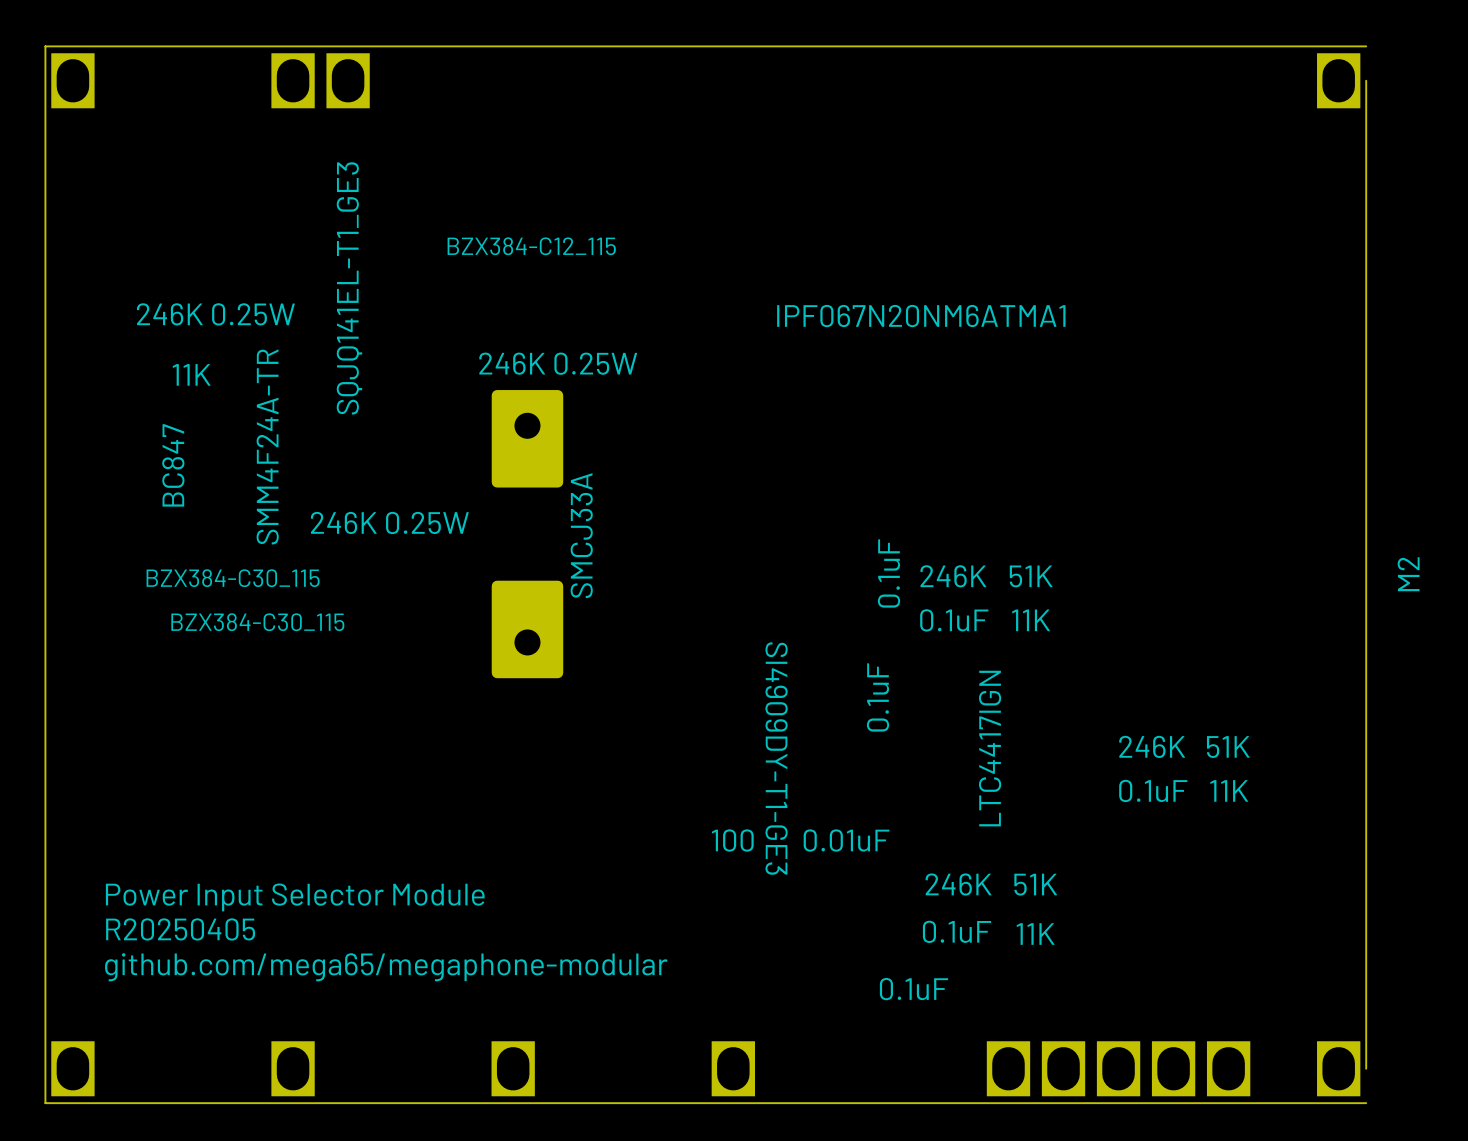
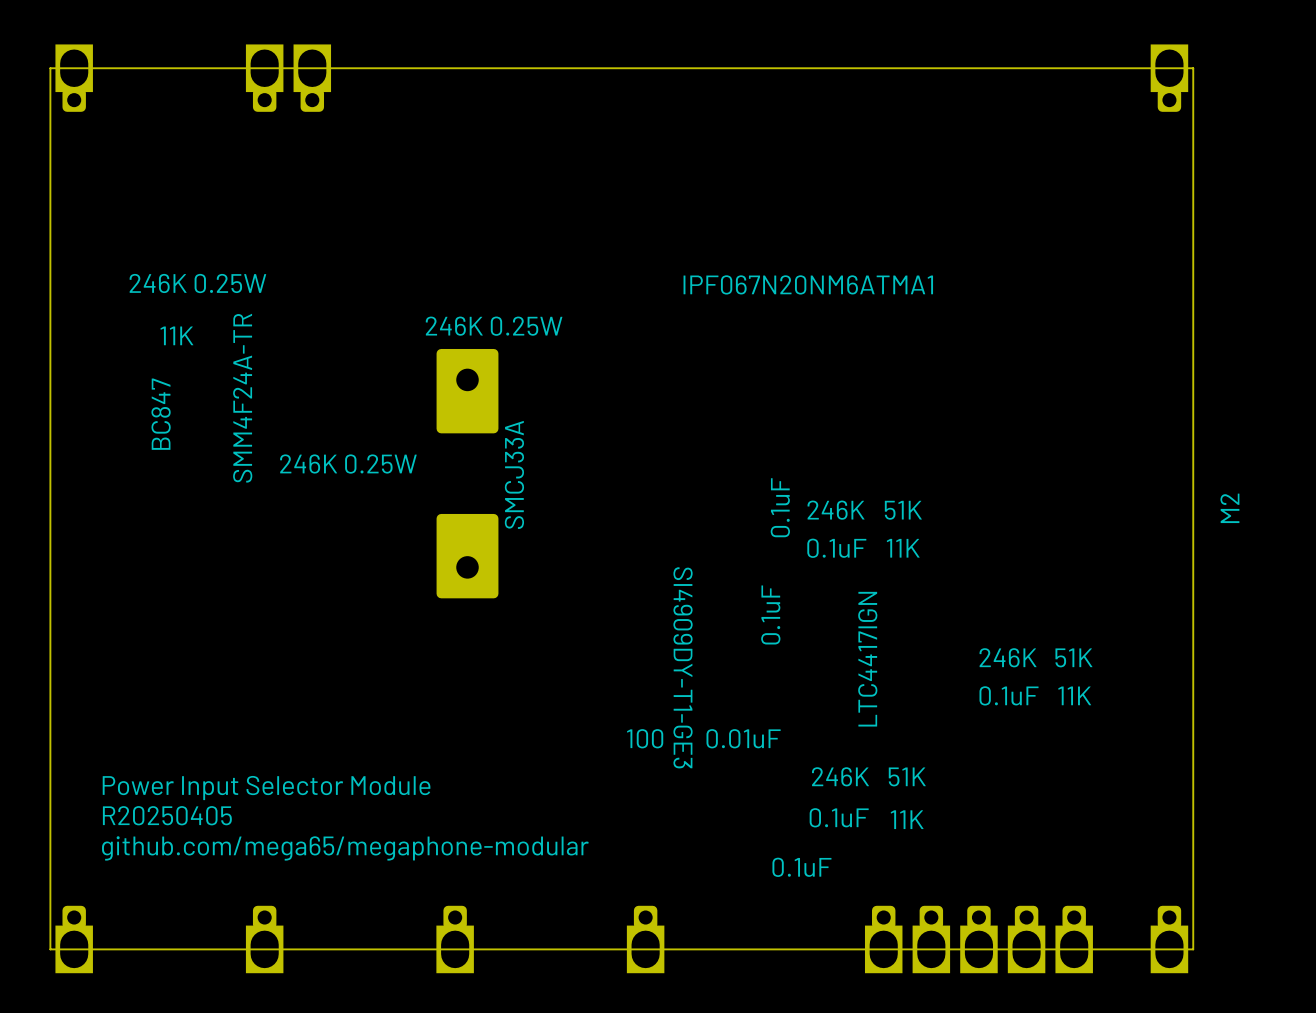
M2 footprint: [44, 45, 1367, 1104] -> [49, 44, 1194, 974]
part: BZX384-C12_115 (531, 246) -> none
part: SQJQ141EL-T1_GE3 (349, 288) -> none
part: BZX384-C30_115 (233, 578) -> none
part: BZX384-C30_115 (257, 622) -> none

